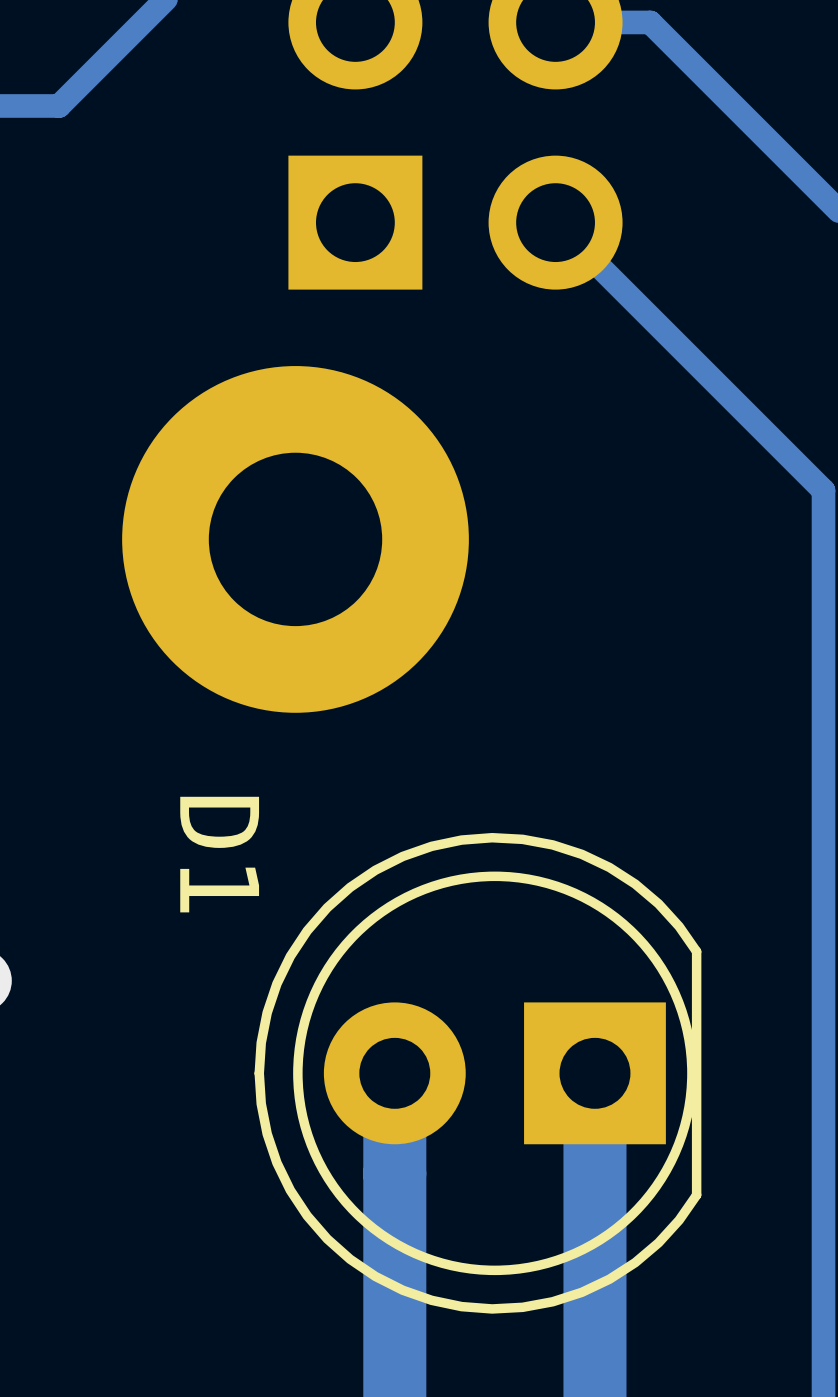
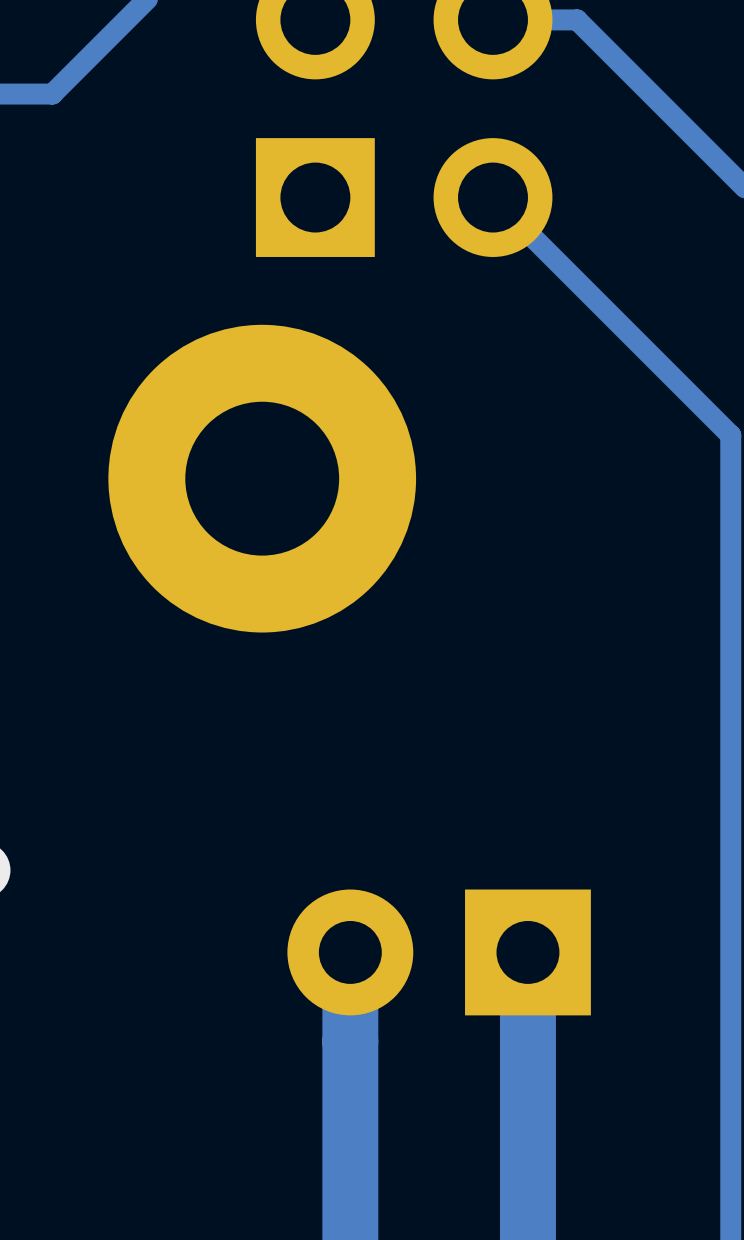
D1: (477, 1073) -> none

